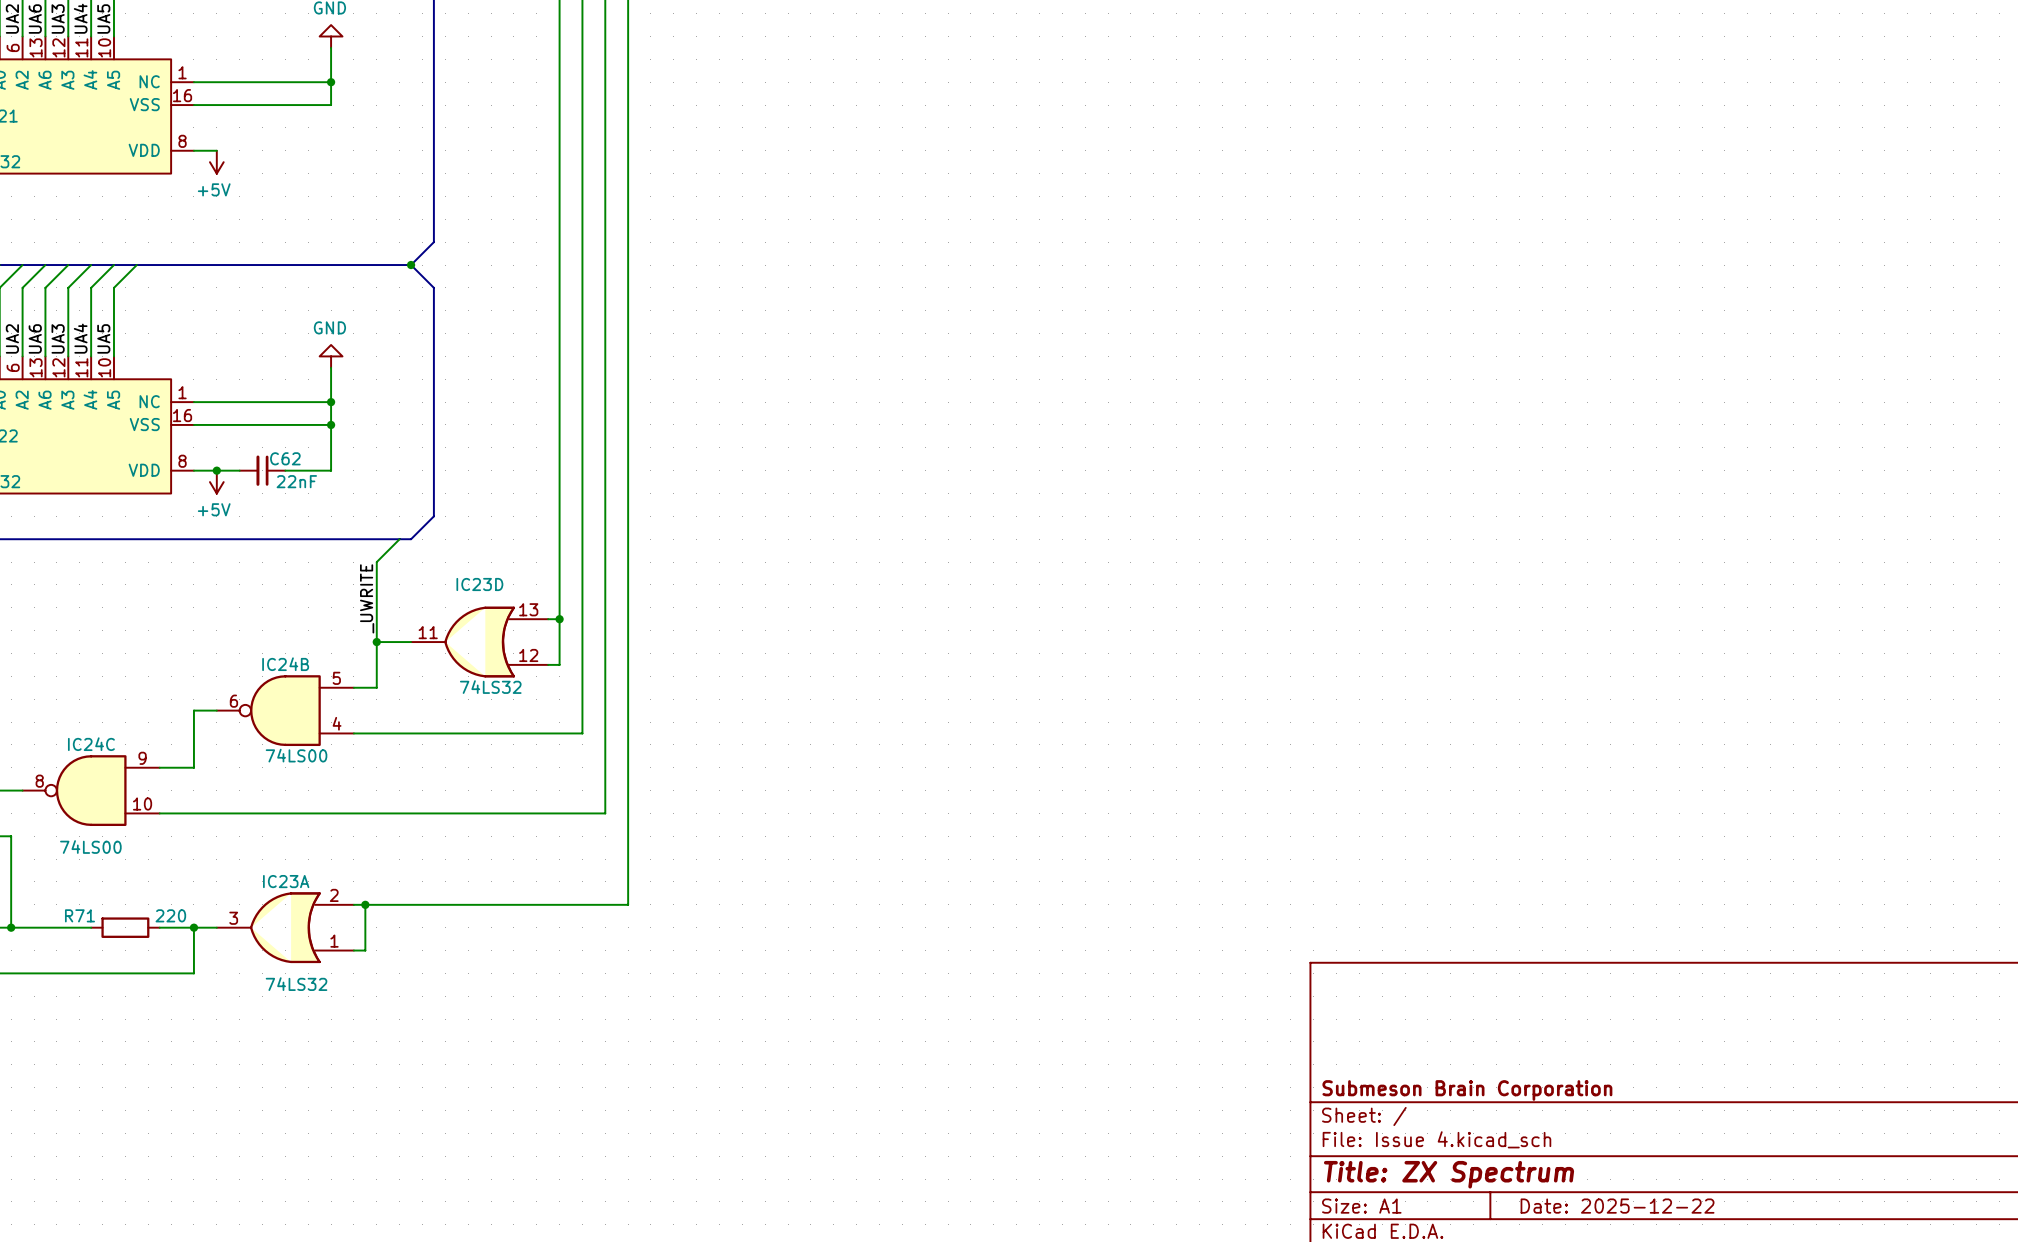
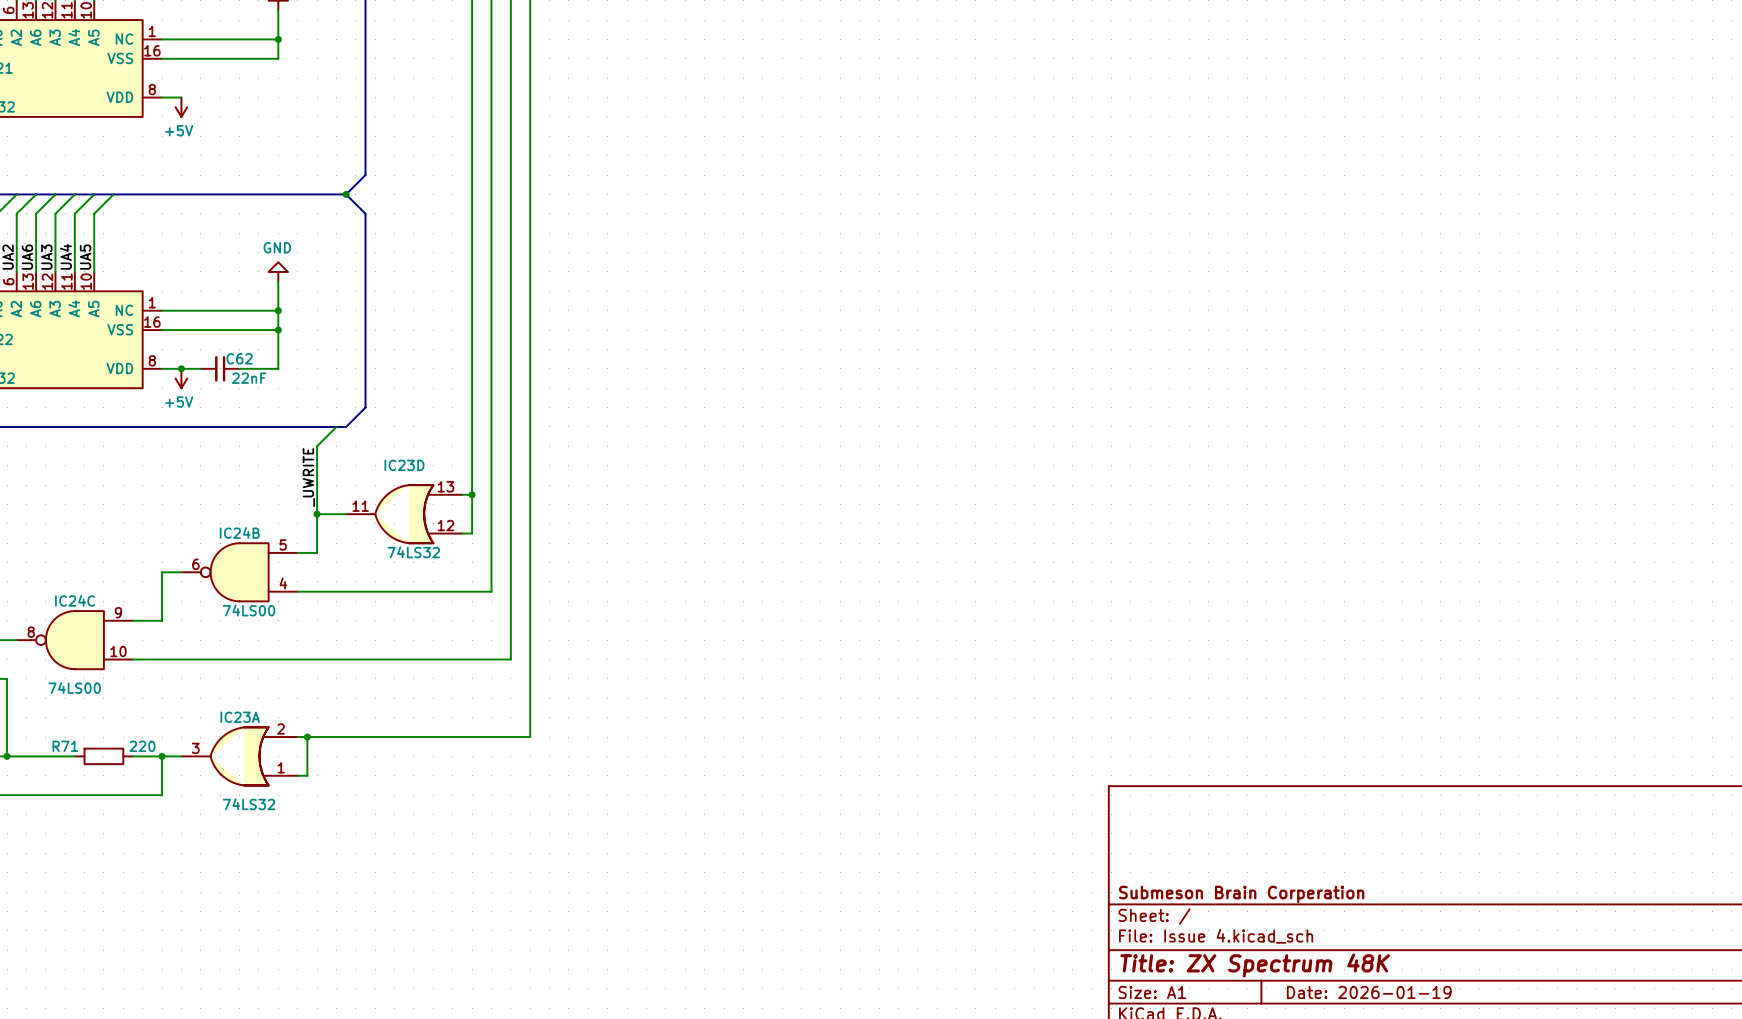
title block: Submeson Brain Corporation (1467, 1090) -> Submeson Brain Corperation (1241, 894)
title block: Title: ZX Spectrum (1449, 1174) -> Title: ZX Spectrum 48K (1255, 965)
title block: Date: 2025-12-22 (1617, 1206) -> Date: 2026-01-19 (1369, 992)

